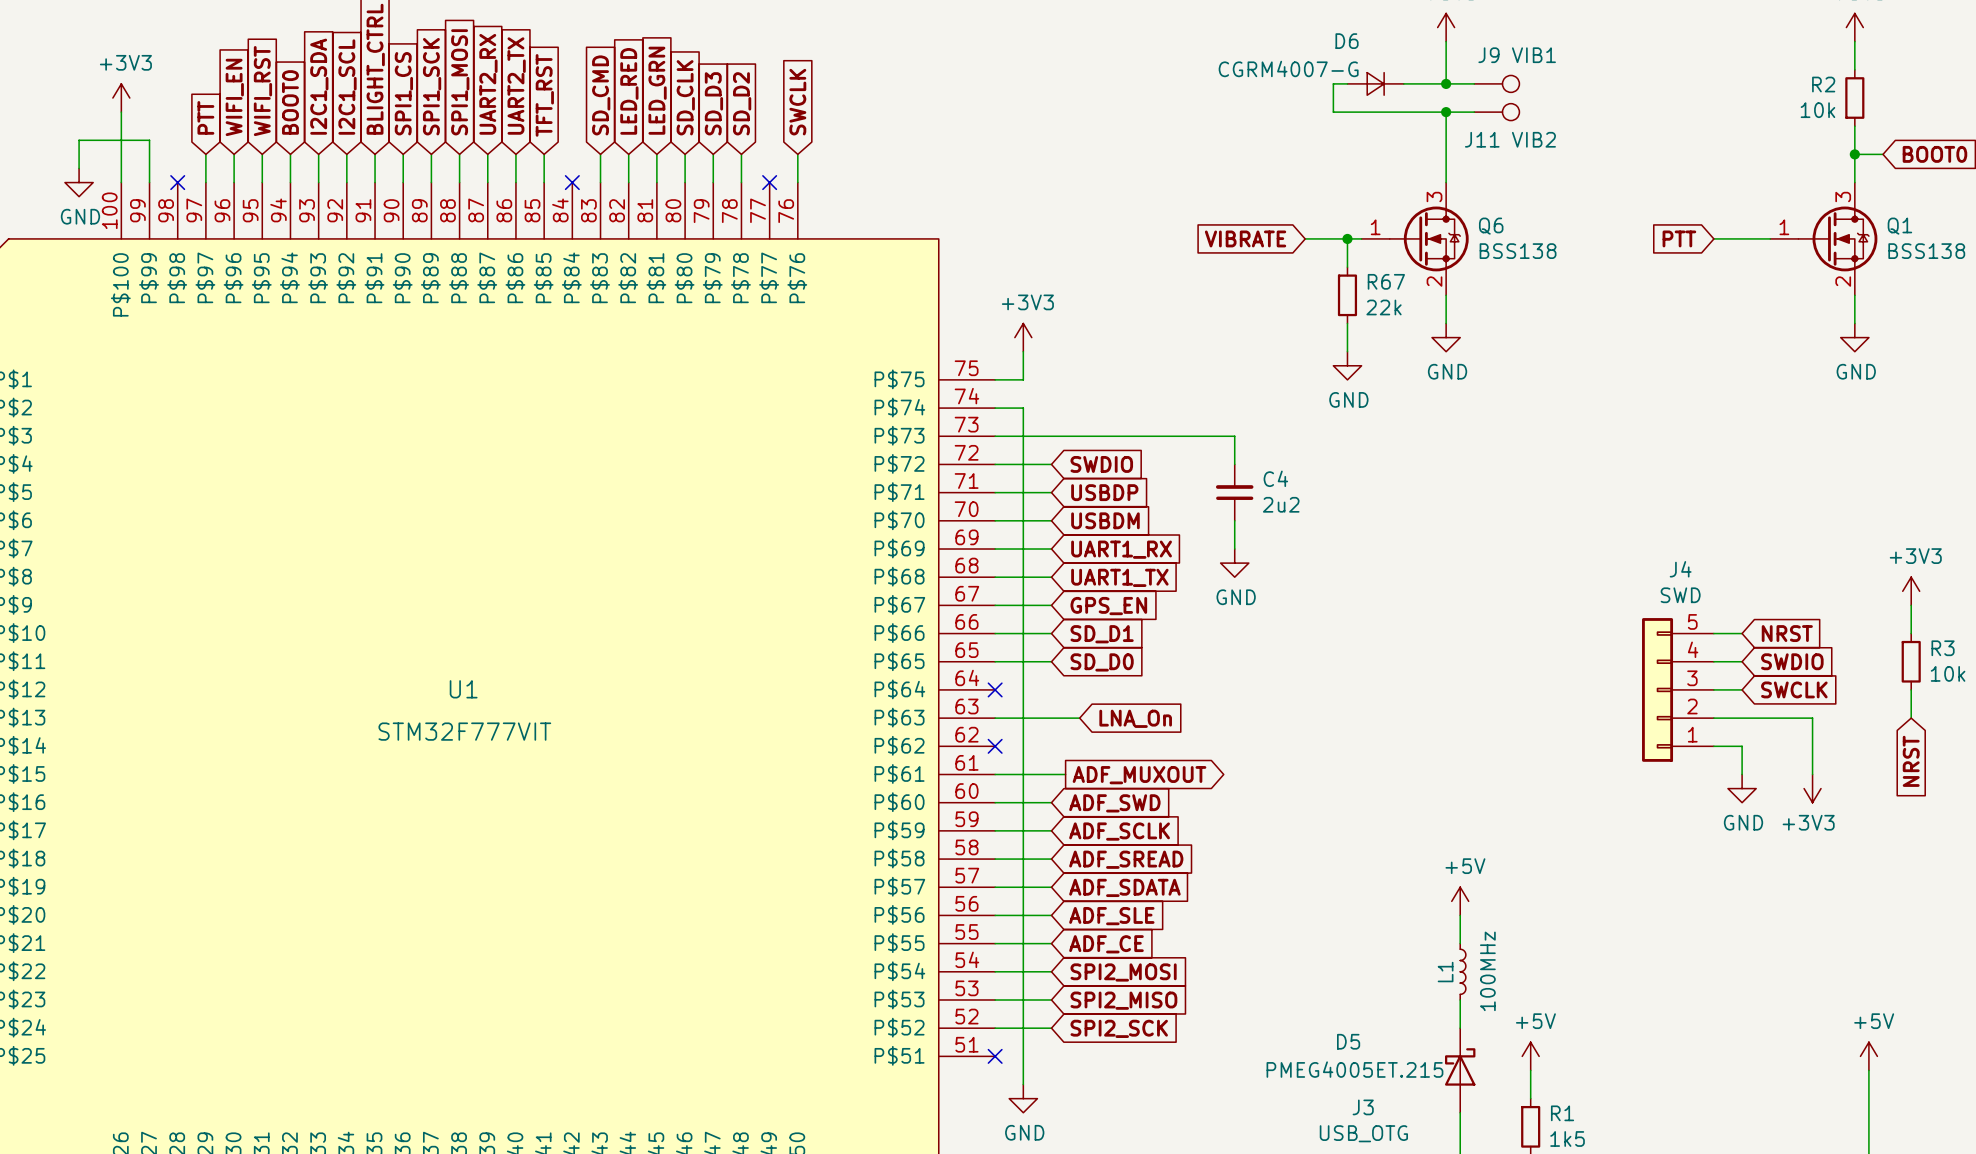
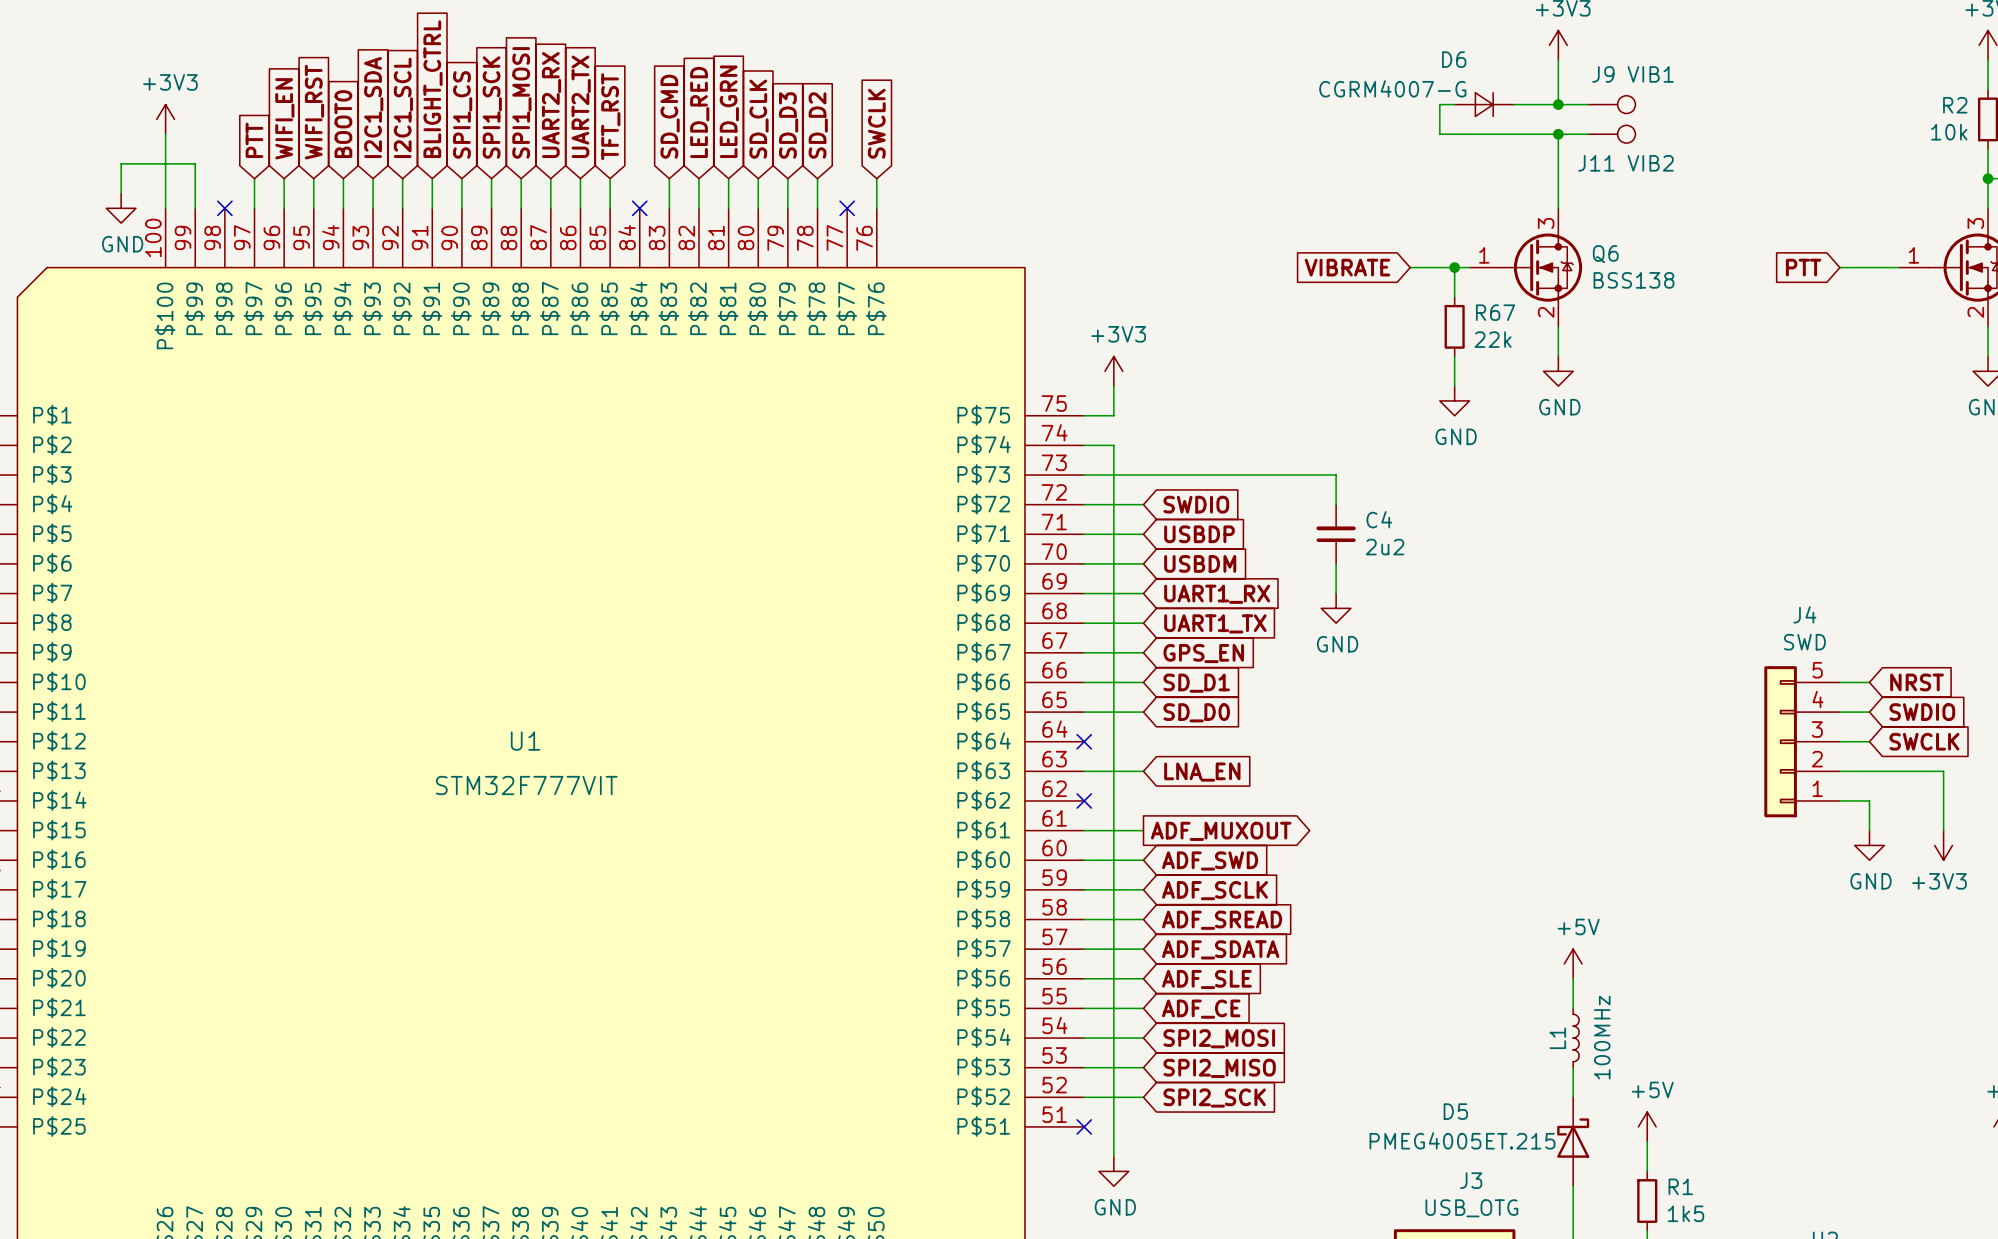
wire: (1051, 718) (1079, 718) -> none
global label: LNA_On (1135, 718) -> LNA_EN (1202, 772)
wire: (1051, 774) (1065, 774) -> none
global label position: ADF_MUXOUT (1139, 775) -> ADF_MUXOUT (1221, 831)

